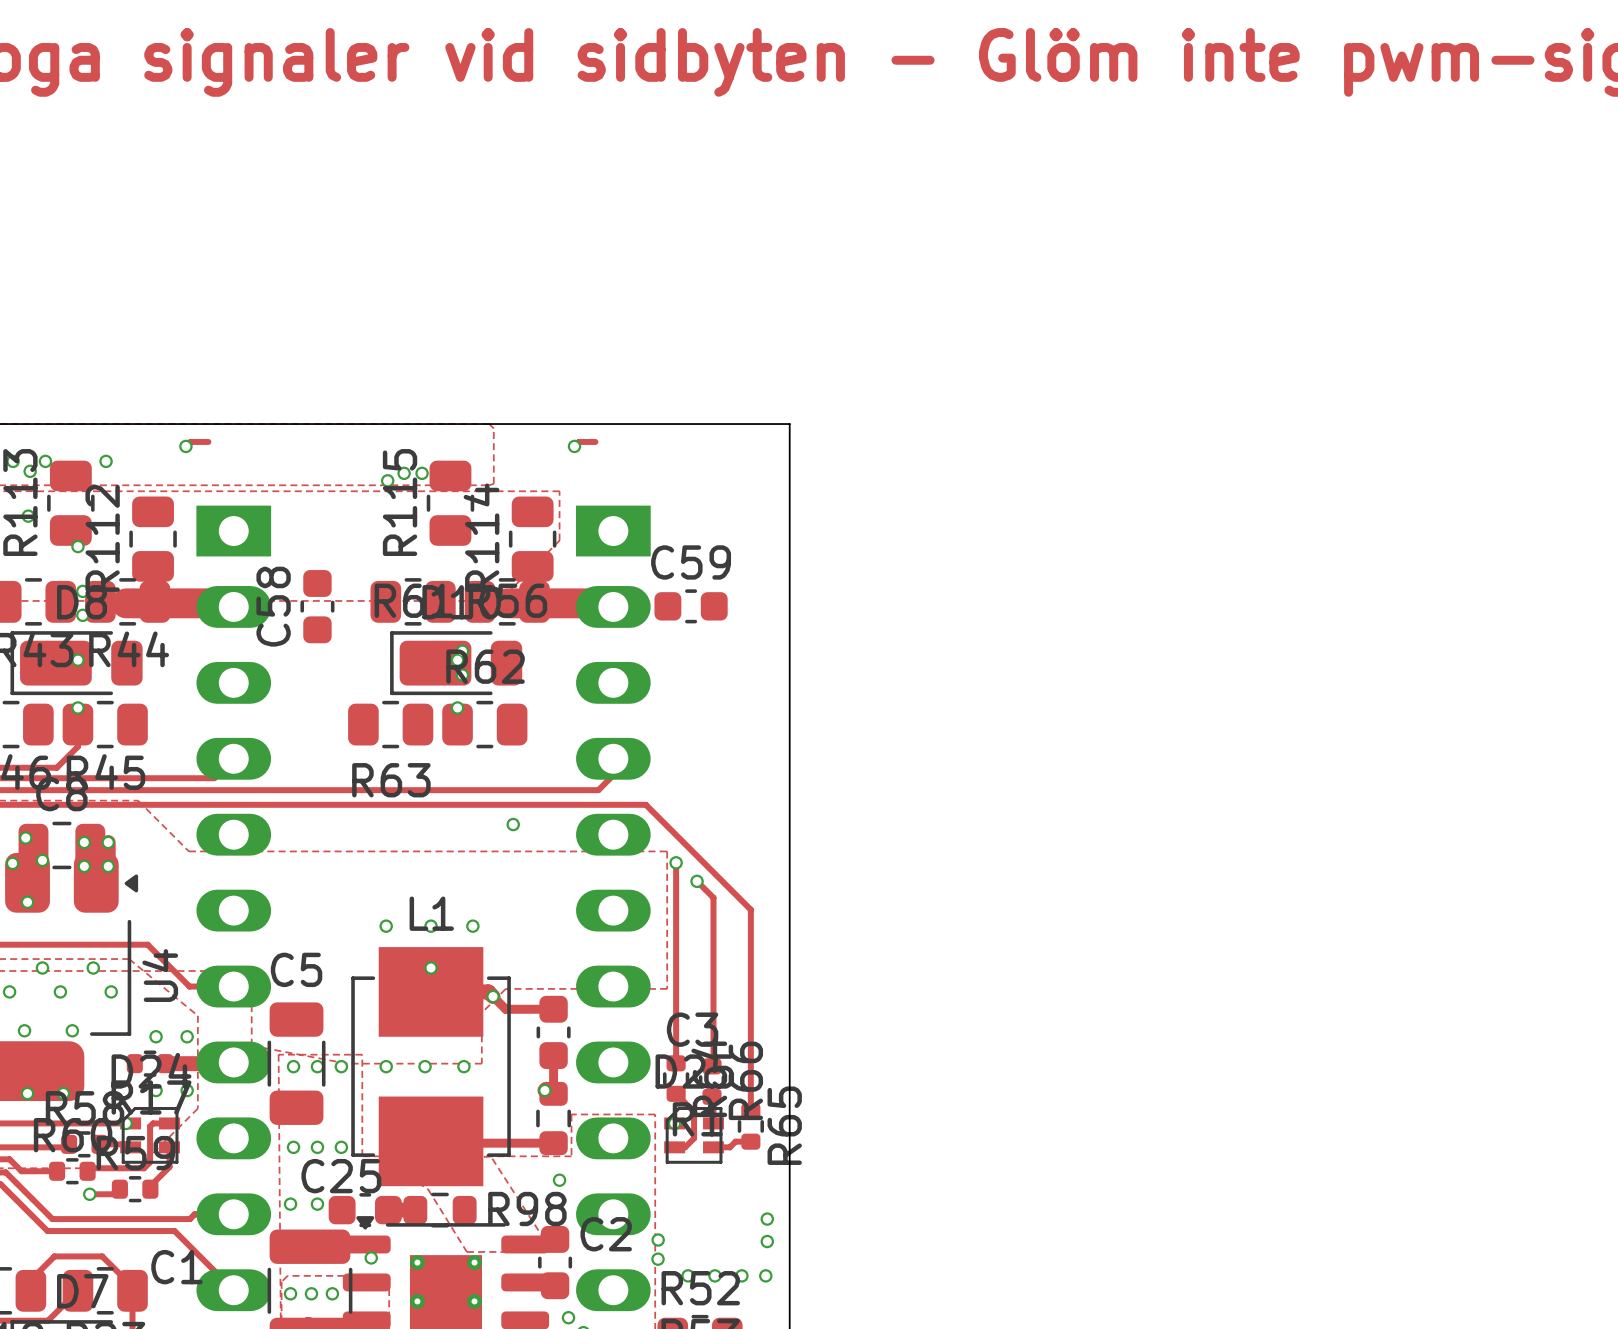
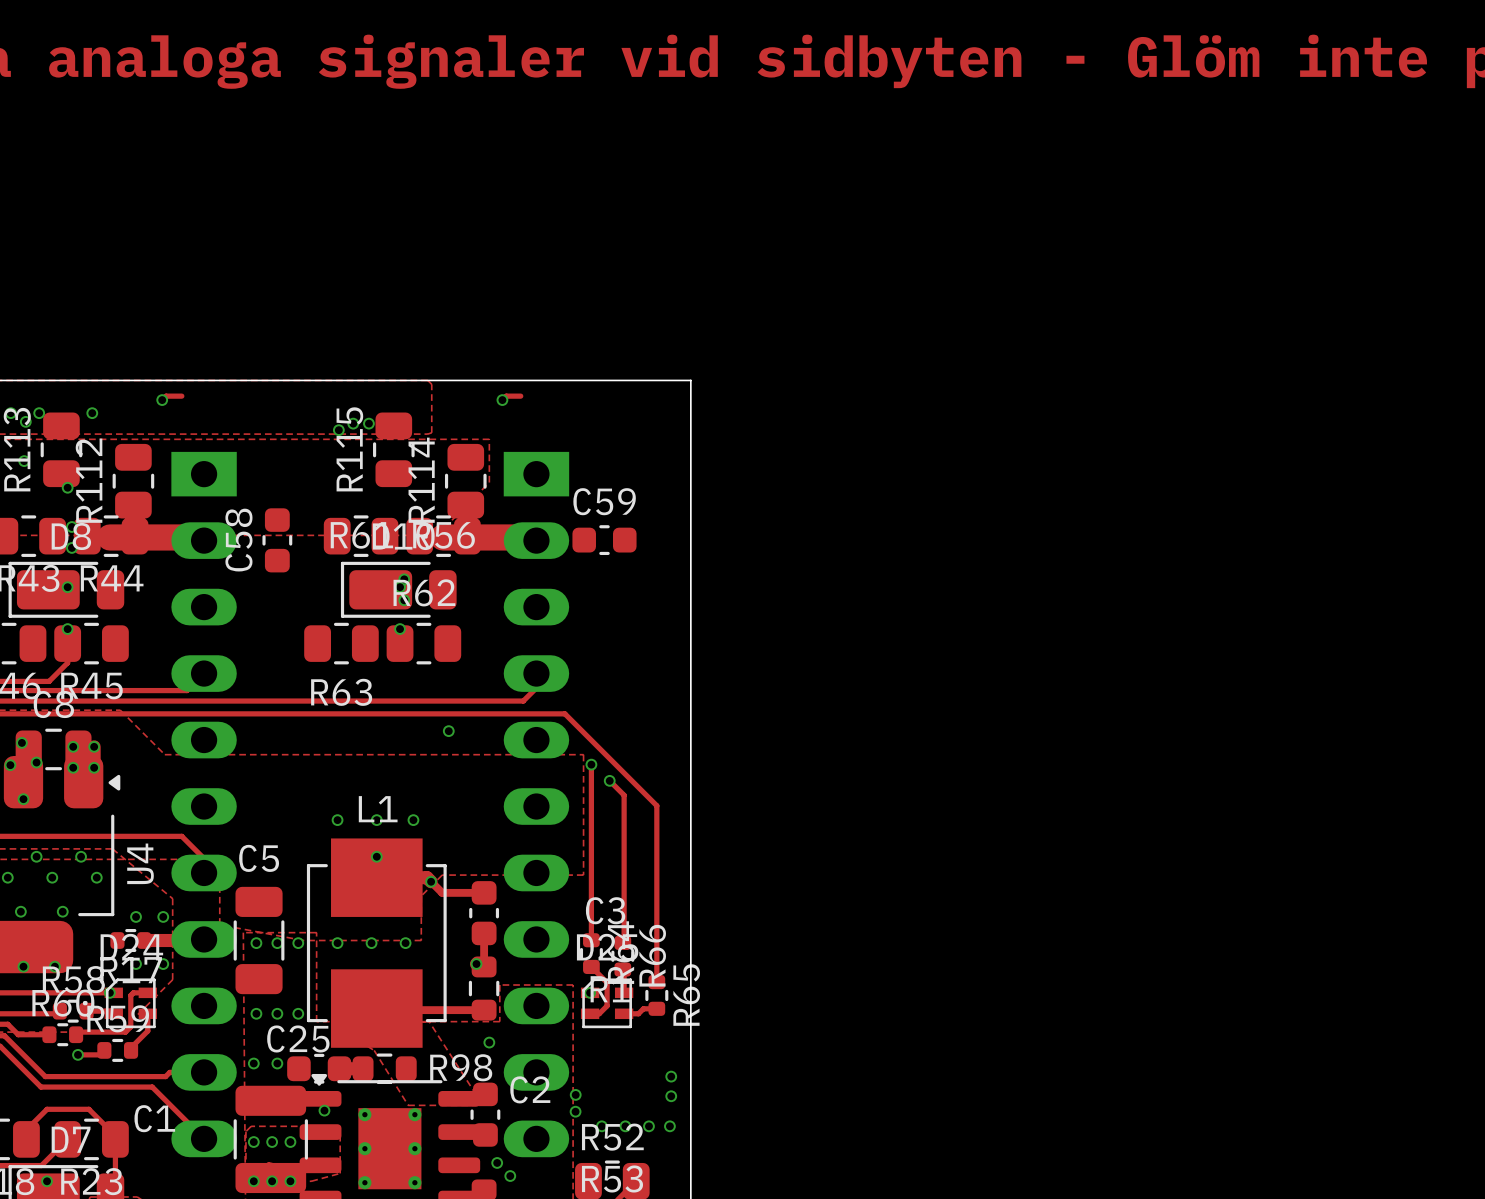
track: (147, 944) (189, 986) (233, 986) -> (128, 836) (181, 836) (204, 858) (204, 872)

